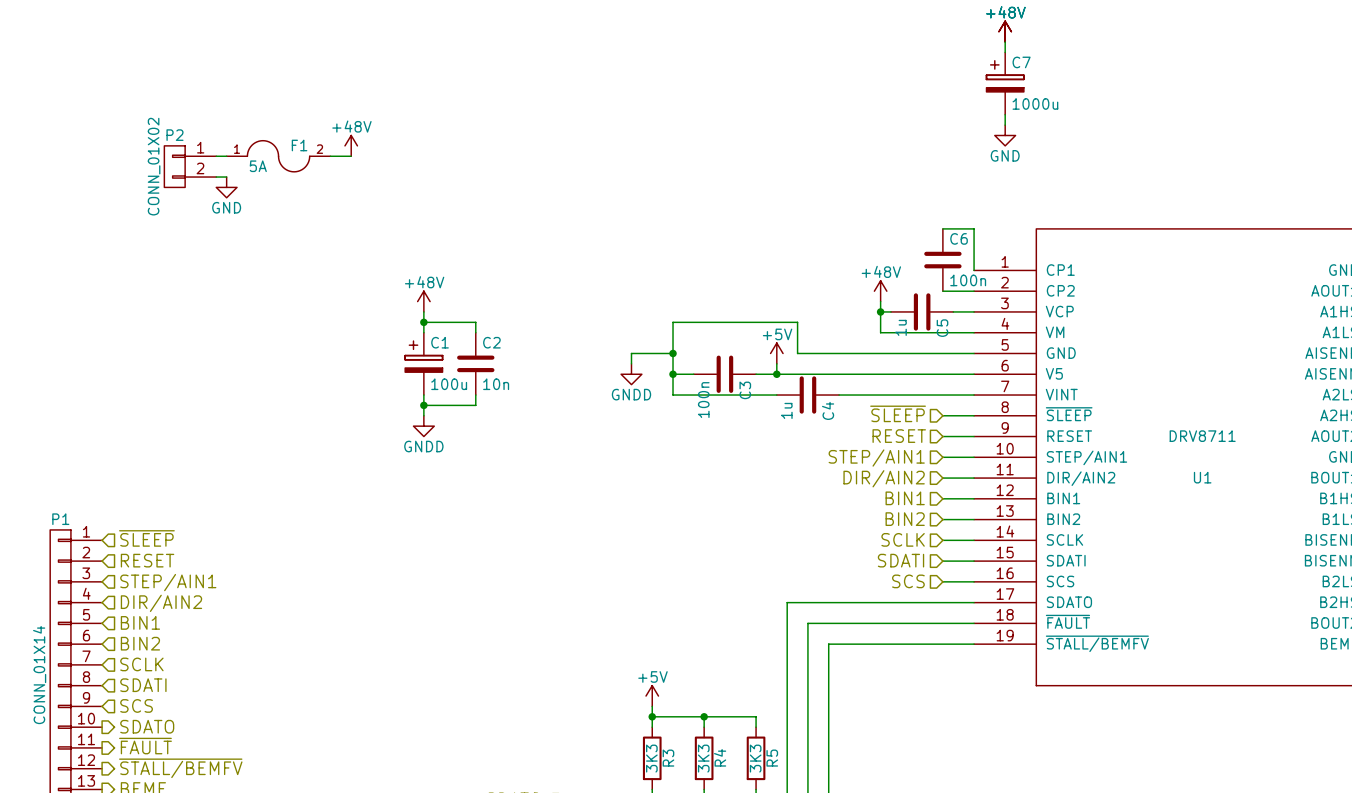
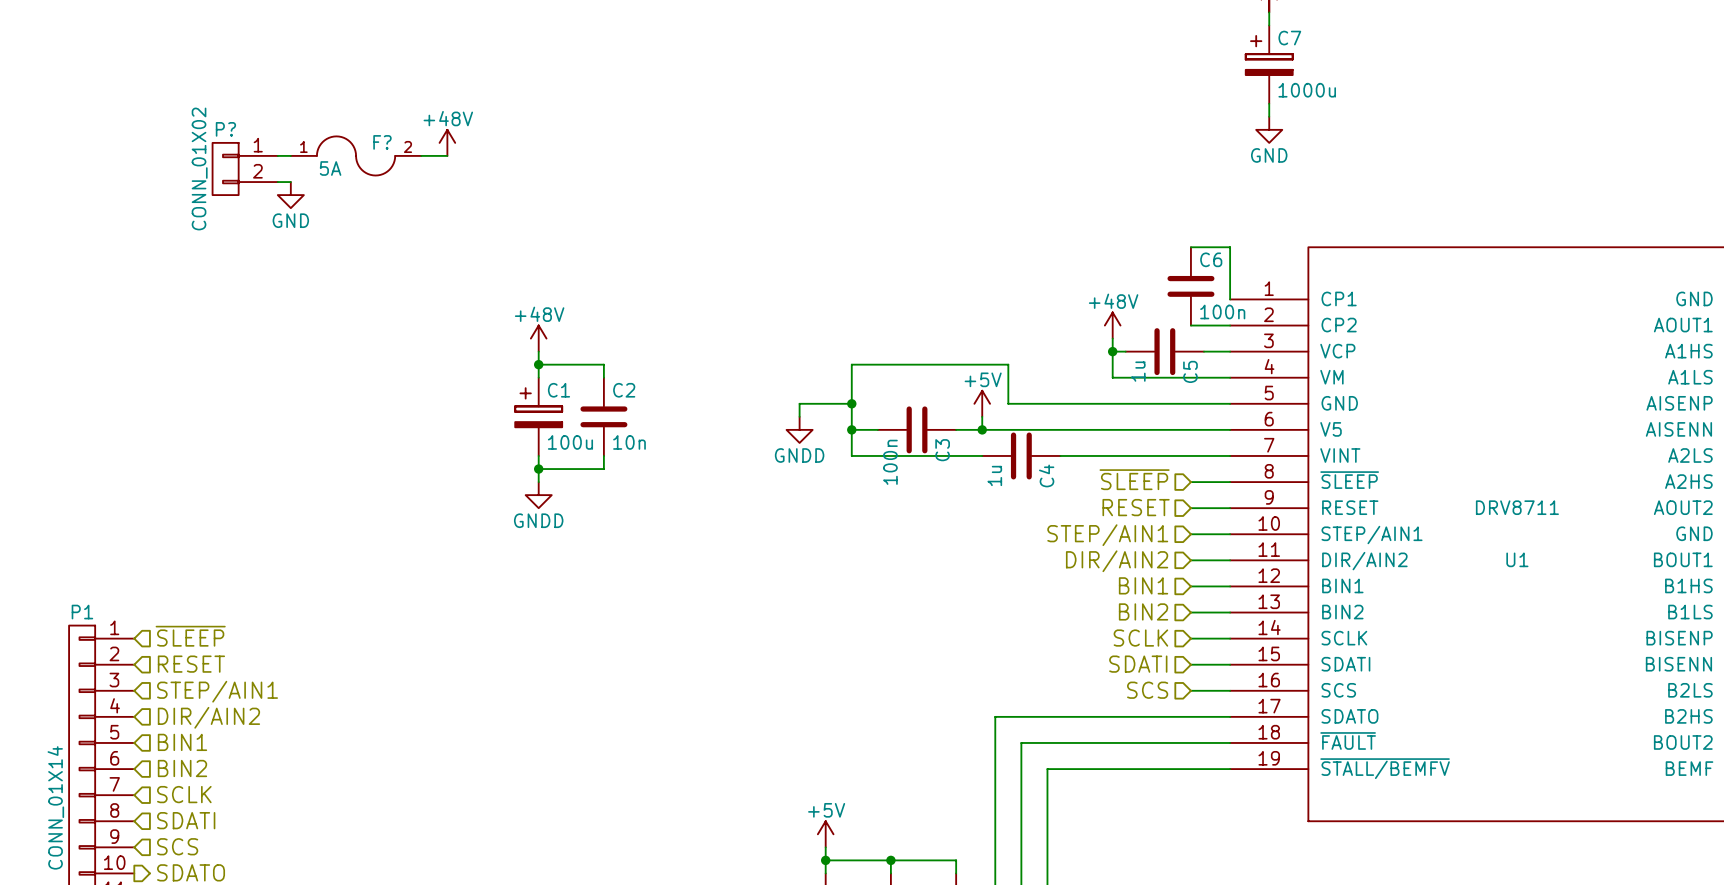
P2 name: P2 (174, 135) -> P? (225, 129)
F1 name: F1 (299, 145) -> F? (382, 142)

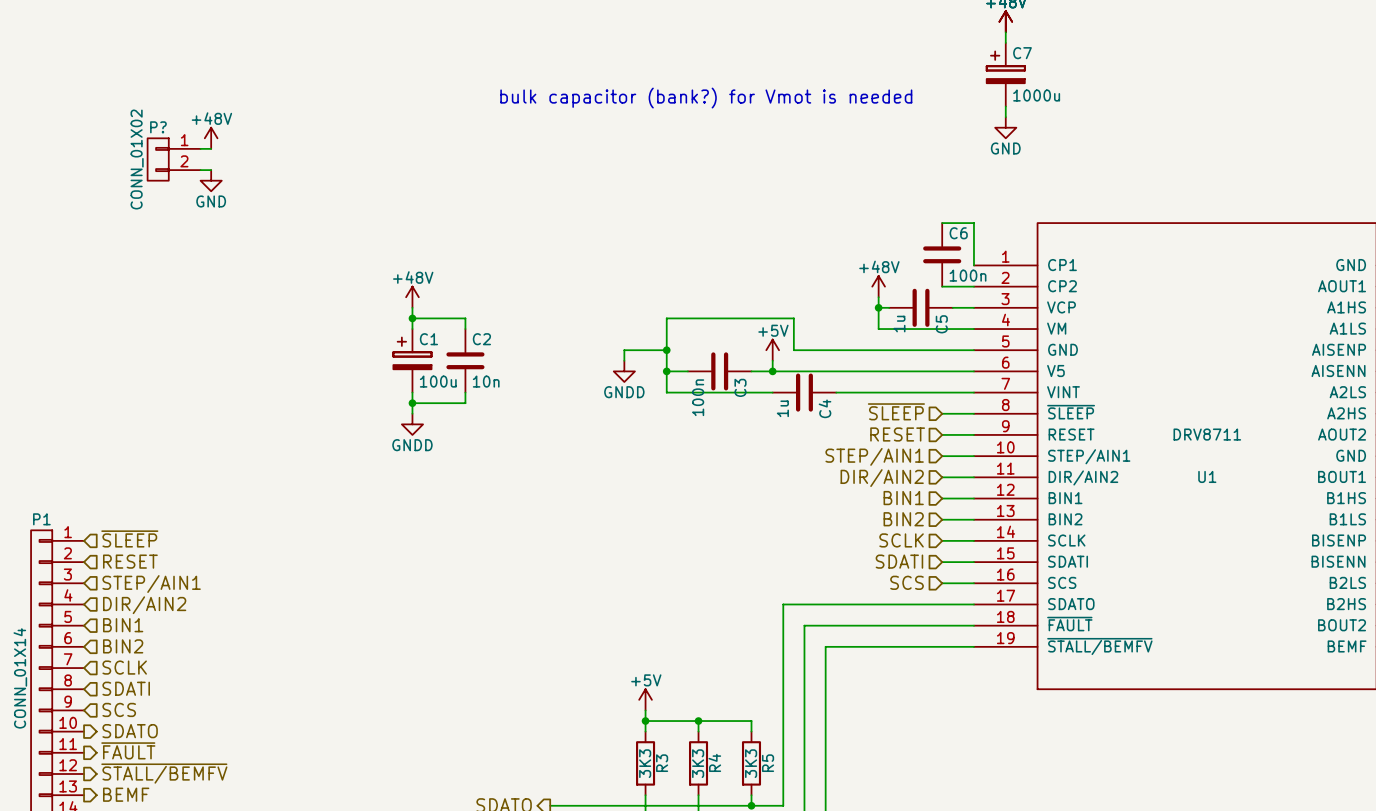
text: none -> bulk capacitor (bank?) for Vmot is needed (706, 98)
power symbol position: +48V (447, 142) -> +48V (211, 138)
F?: 5A (356, 155) -> none
wire: (421, 155) (447, 155) -> none

